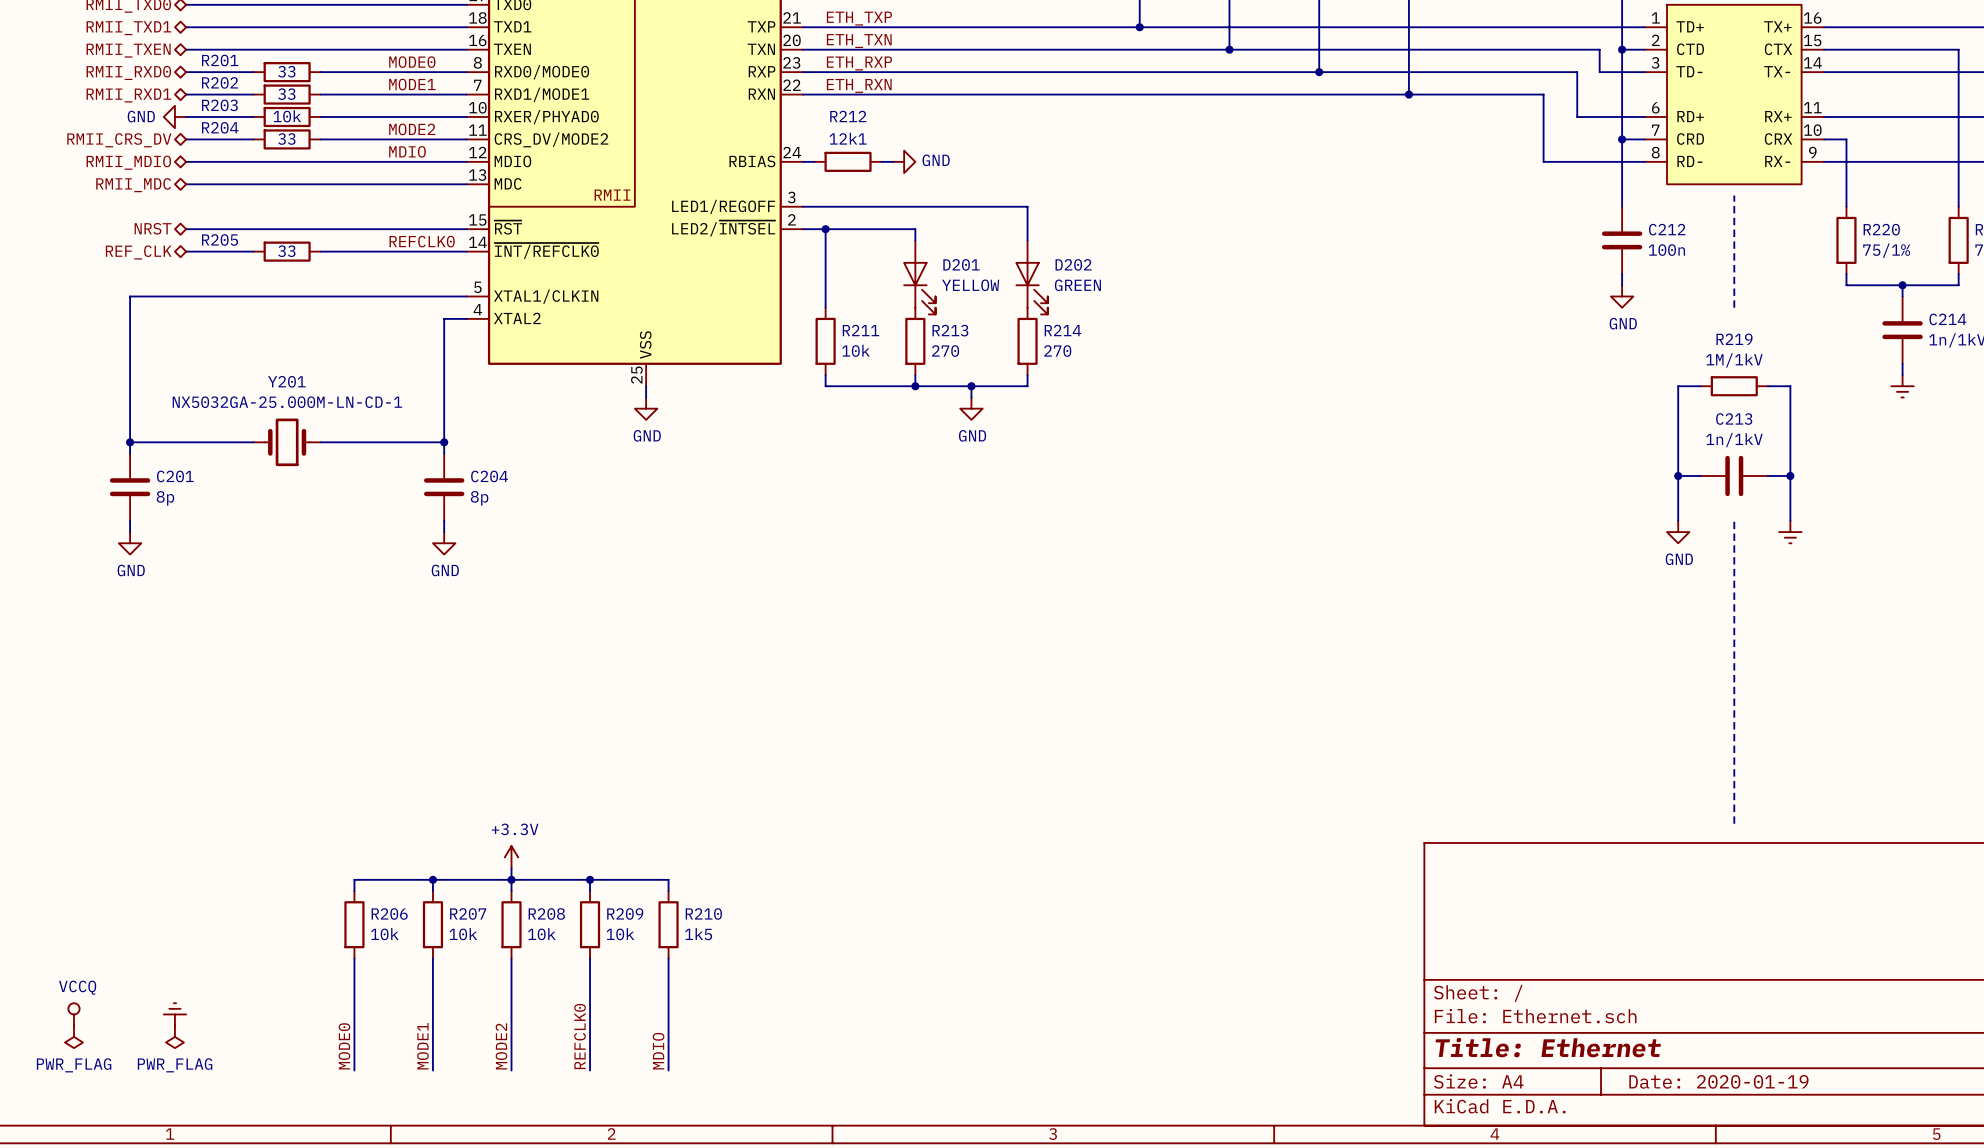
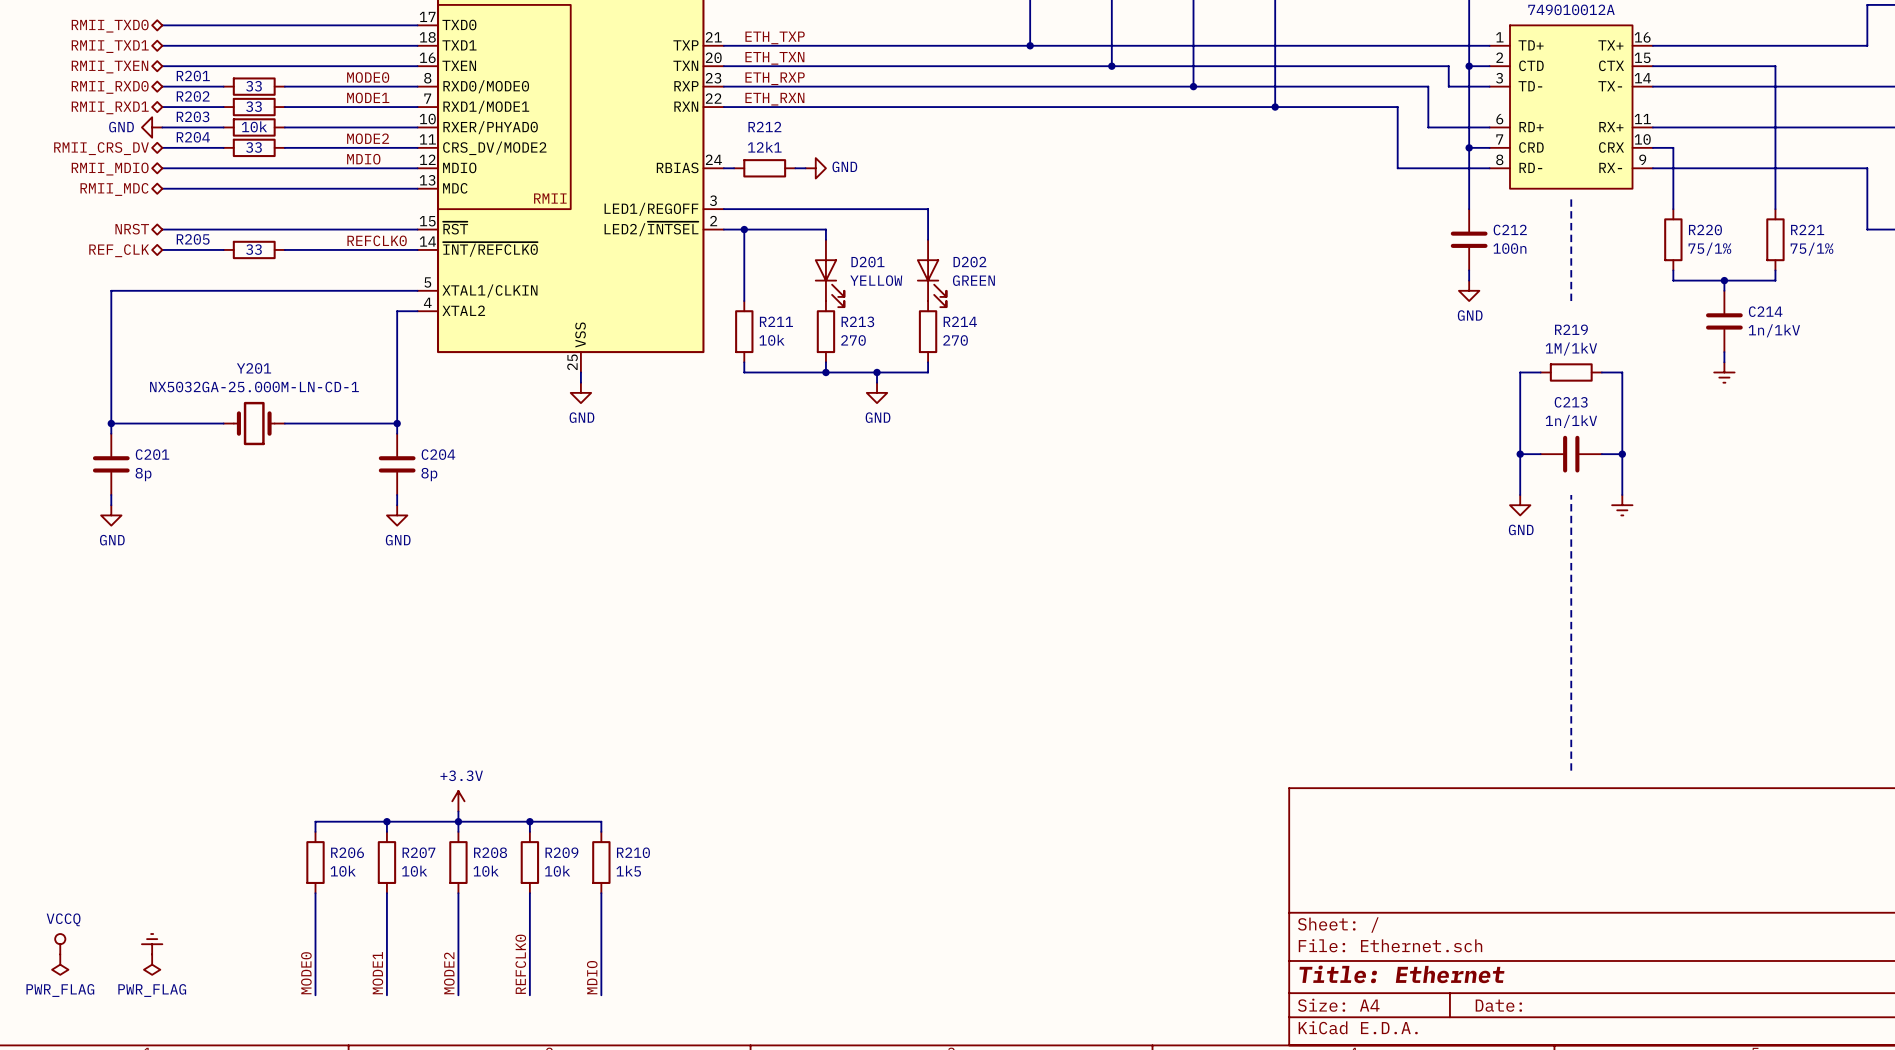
title block: Date: 2020-01-19 (1718, 1081) -> Date: (1498, 1005)

